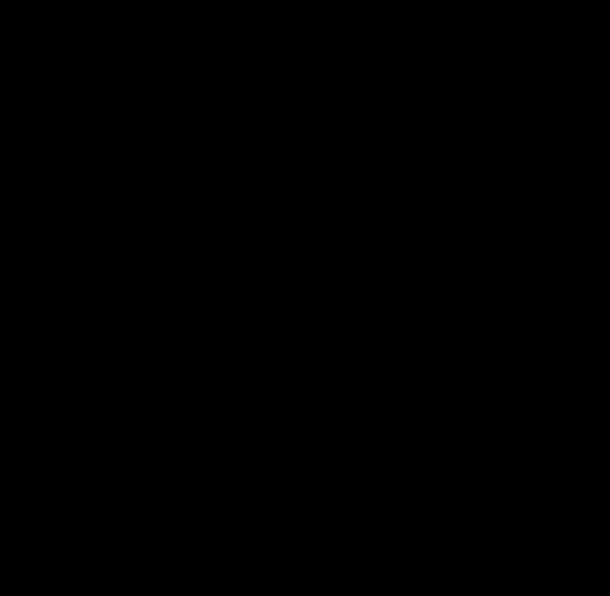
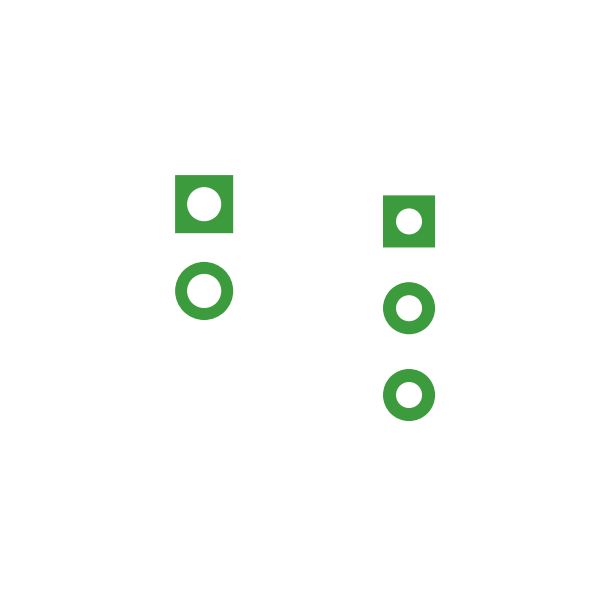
part: none -> (204, 247)
part: none -> (409, 308)

